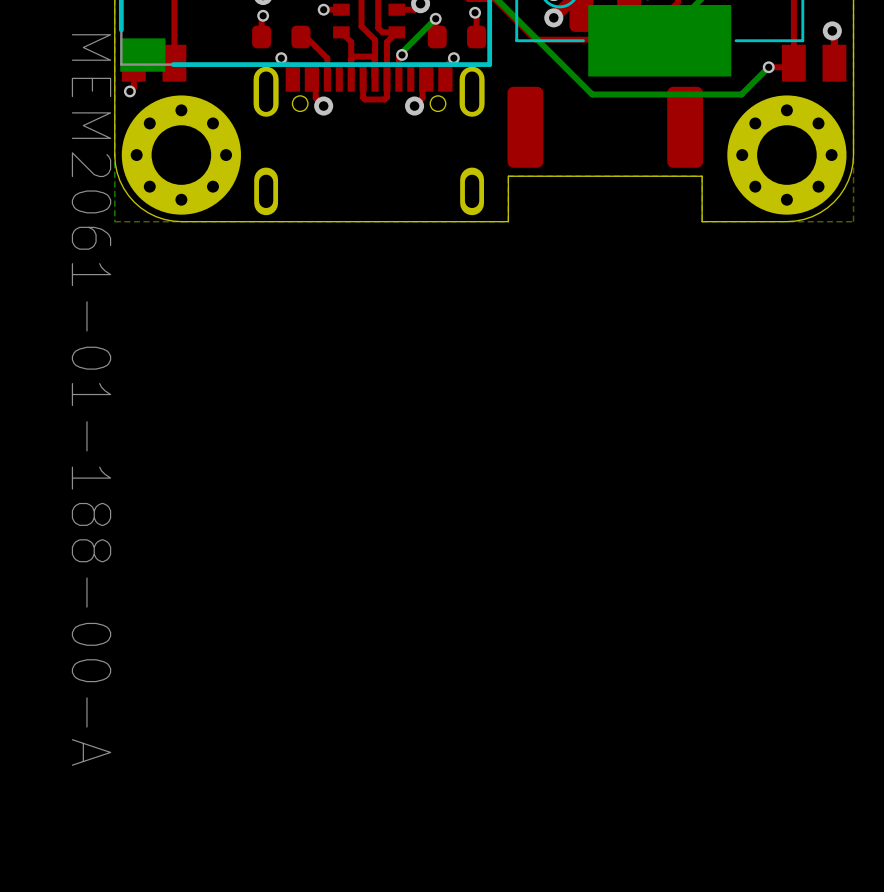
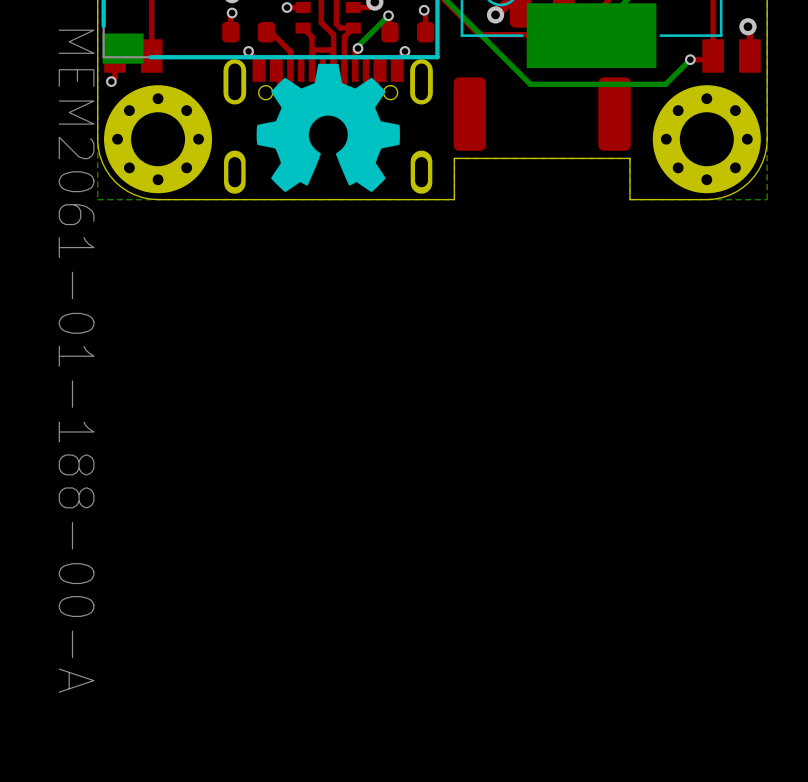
drawing: none -> [256, 63, 401, 193]

